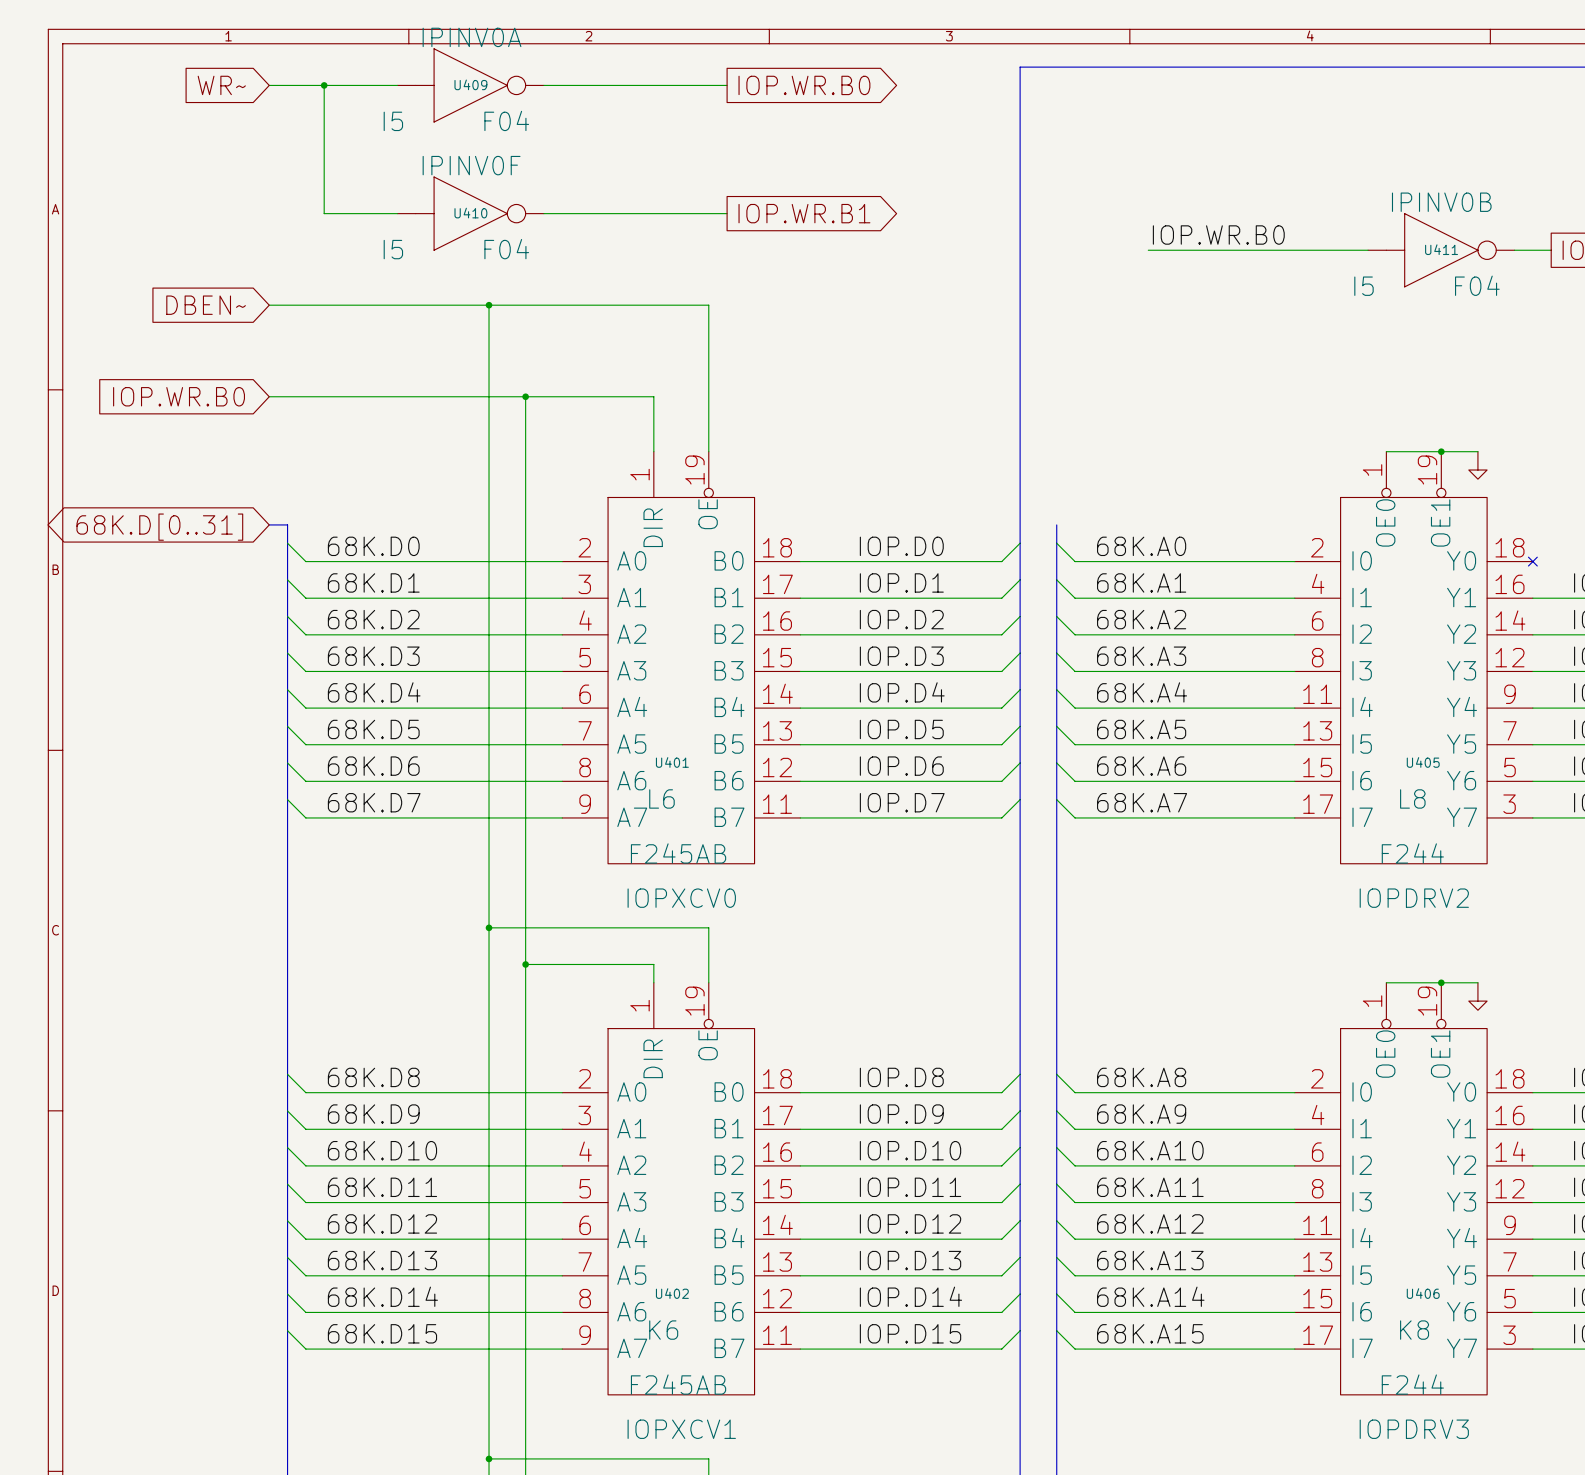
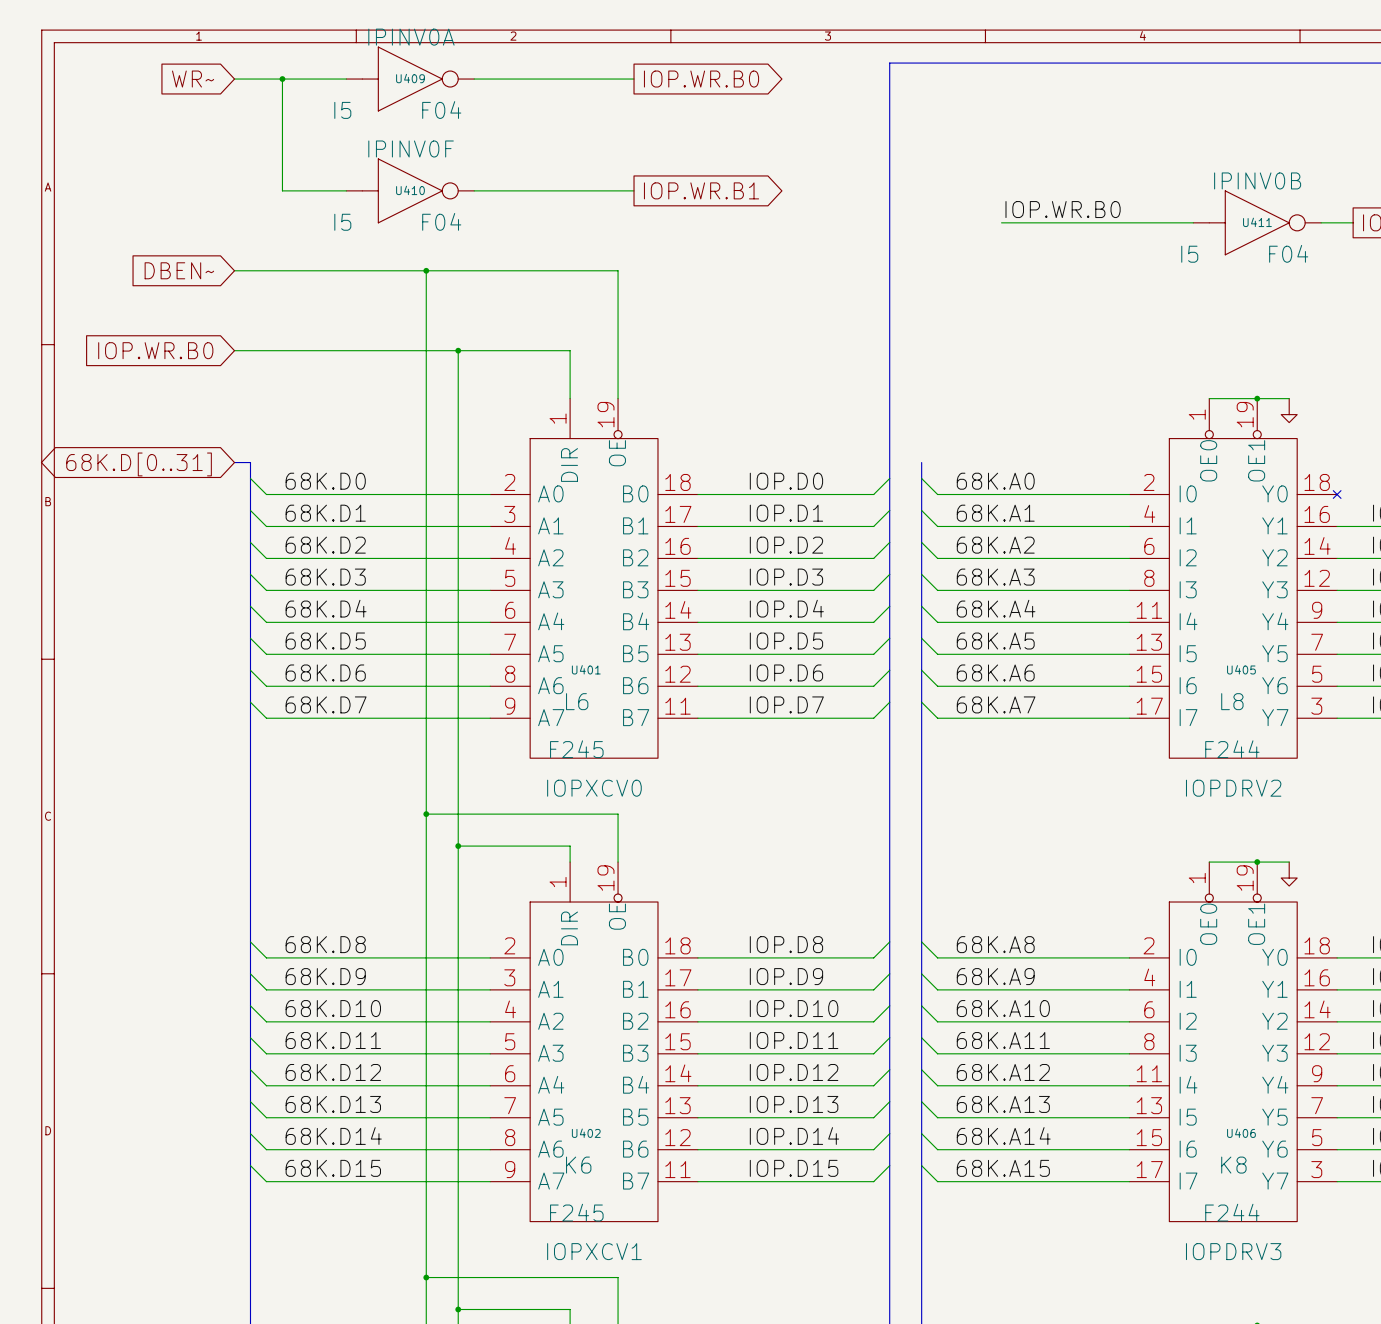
U401 value: F245AB (678, 853) -> F245 (576, 749)
U402 value: F245AB (678, 1384) -> F245 (576, 1212)

